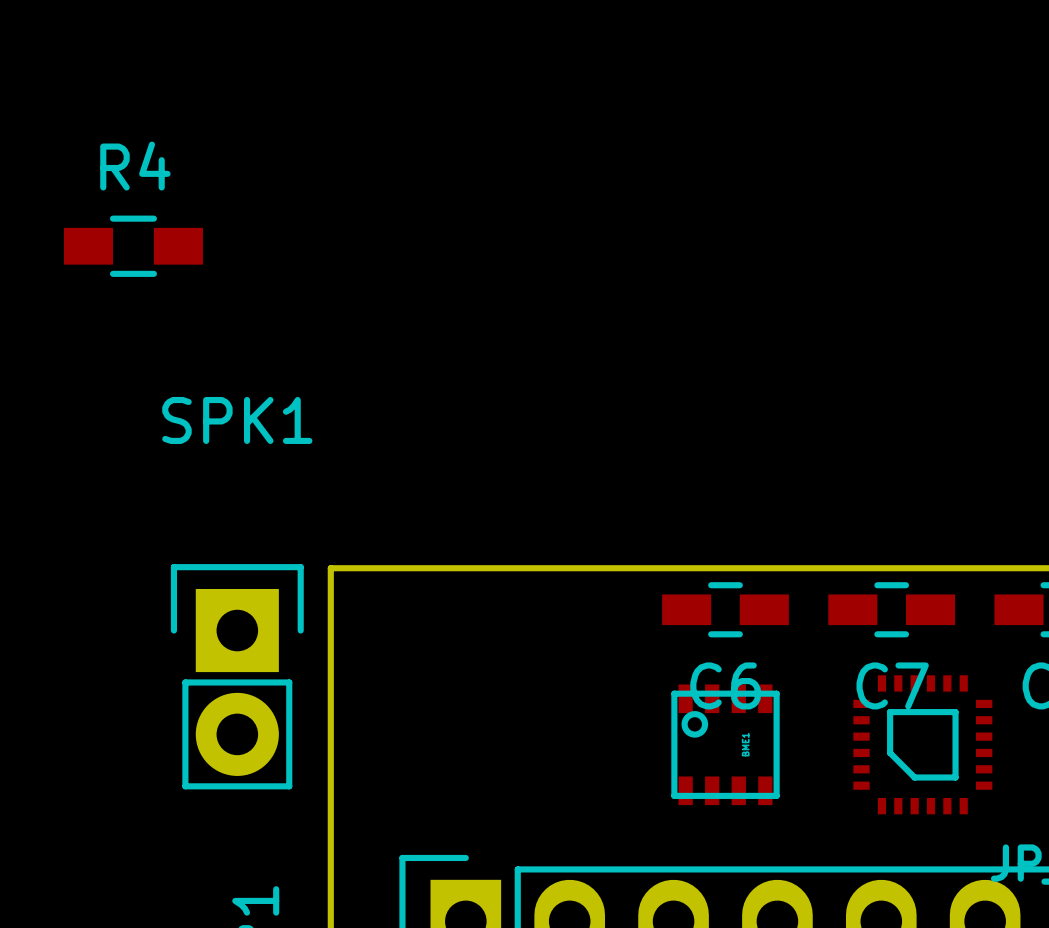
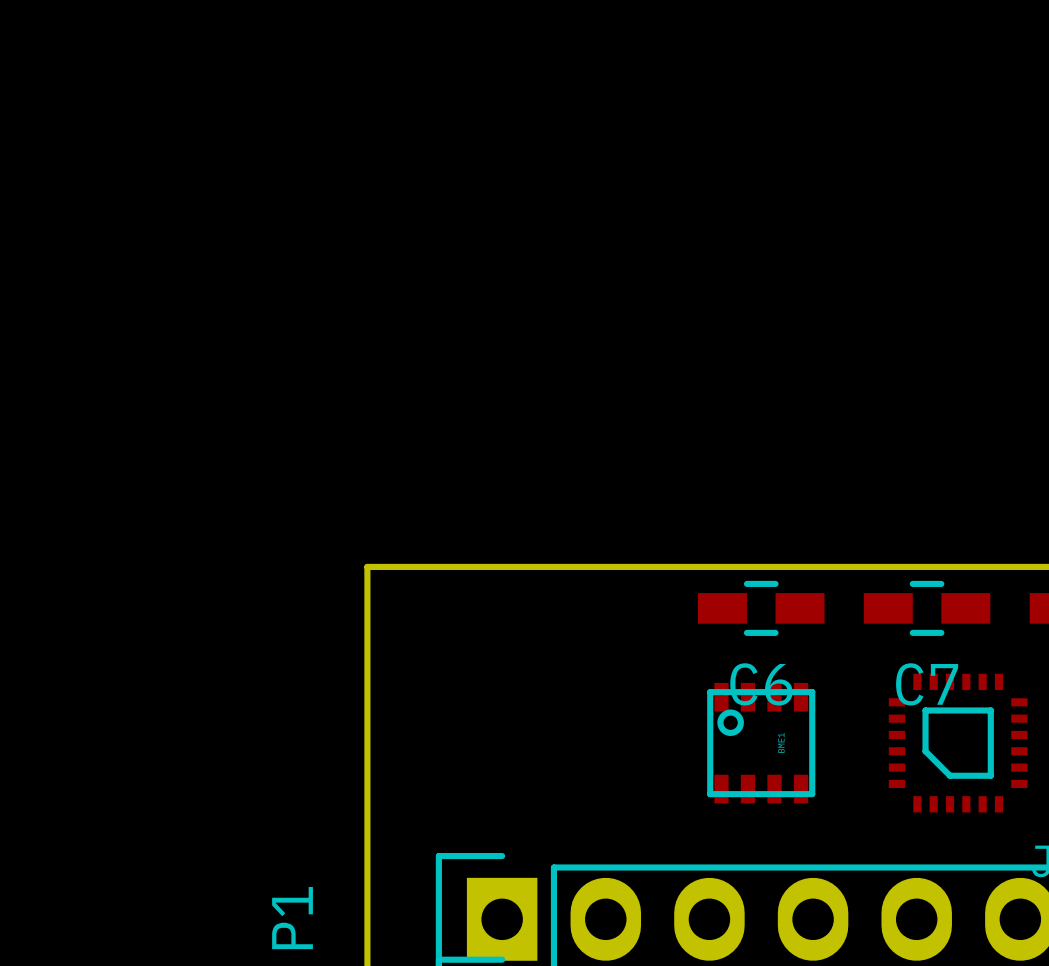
R4: (133, 246) -> none
SPK1: (237, 676) -> none

